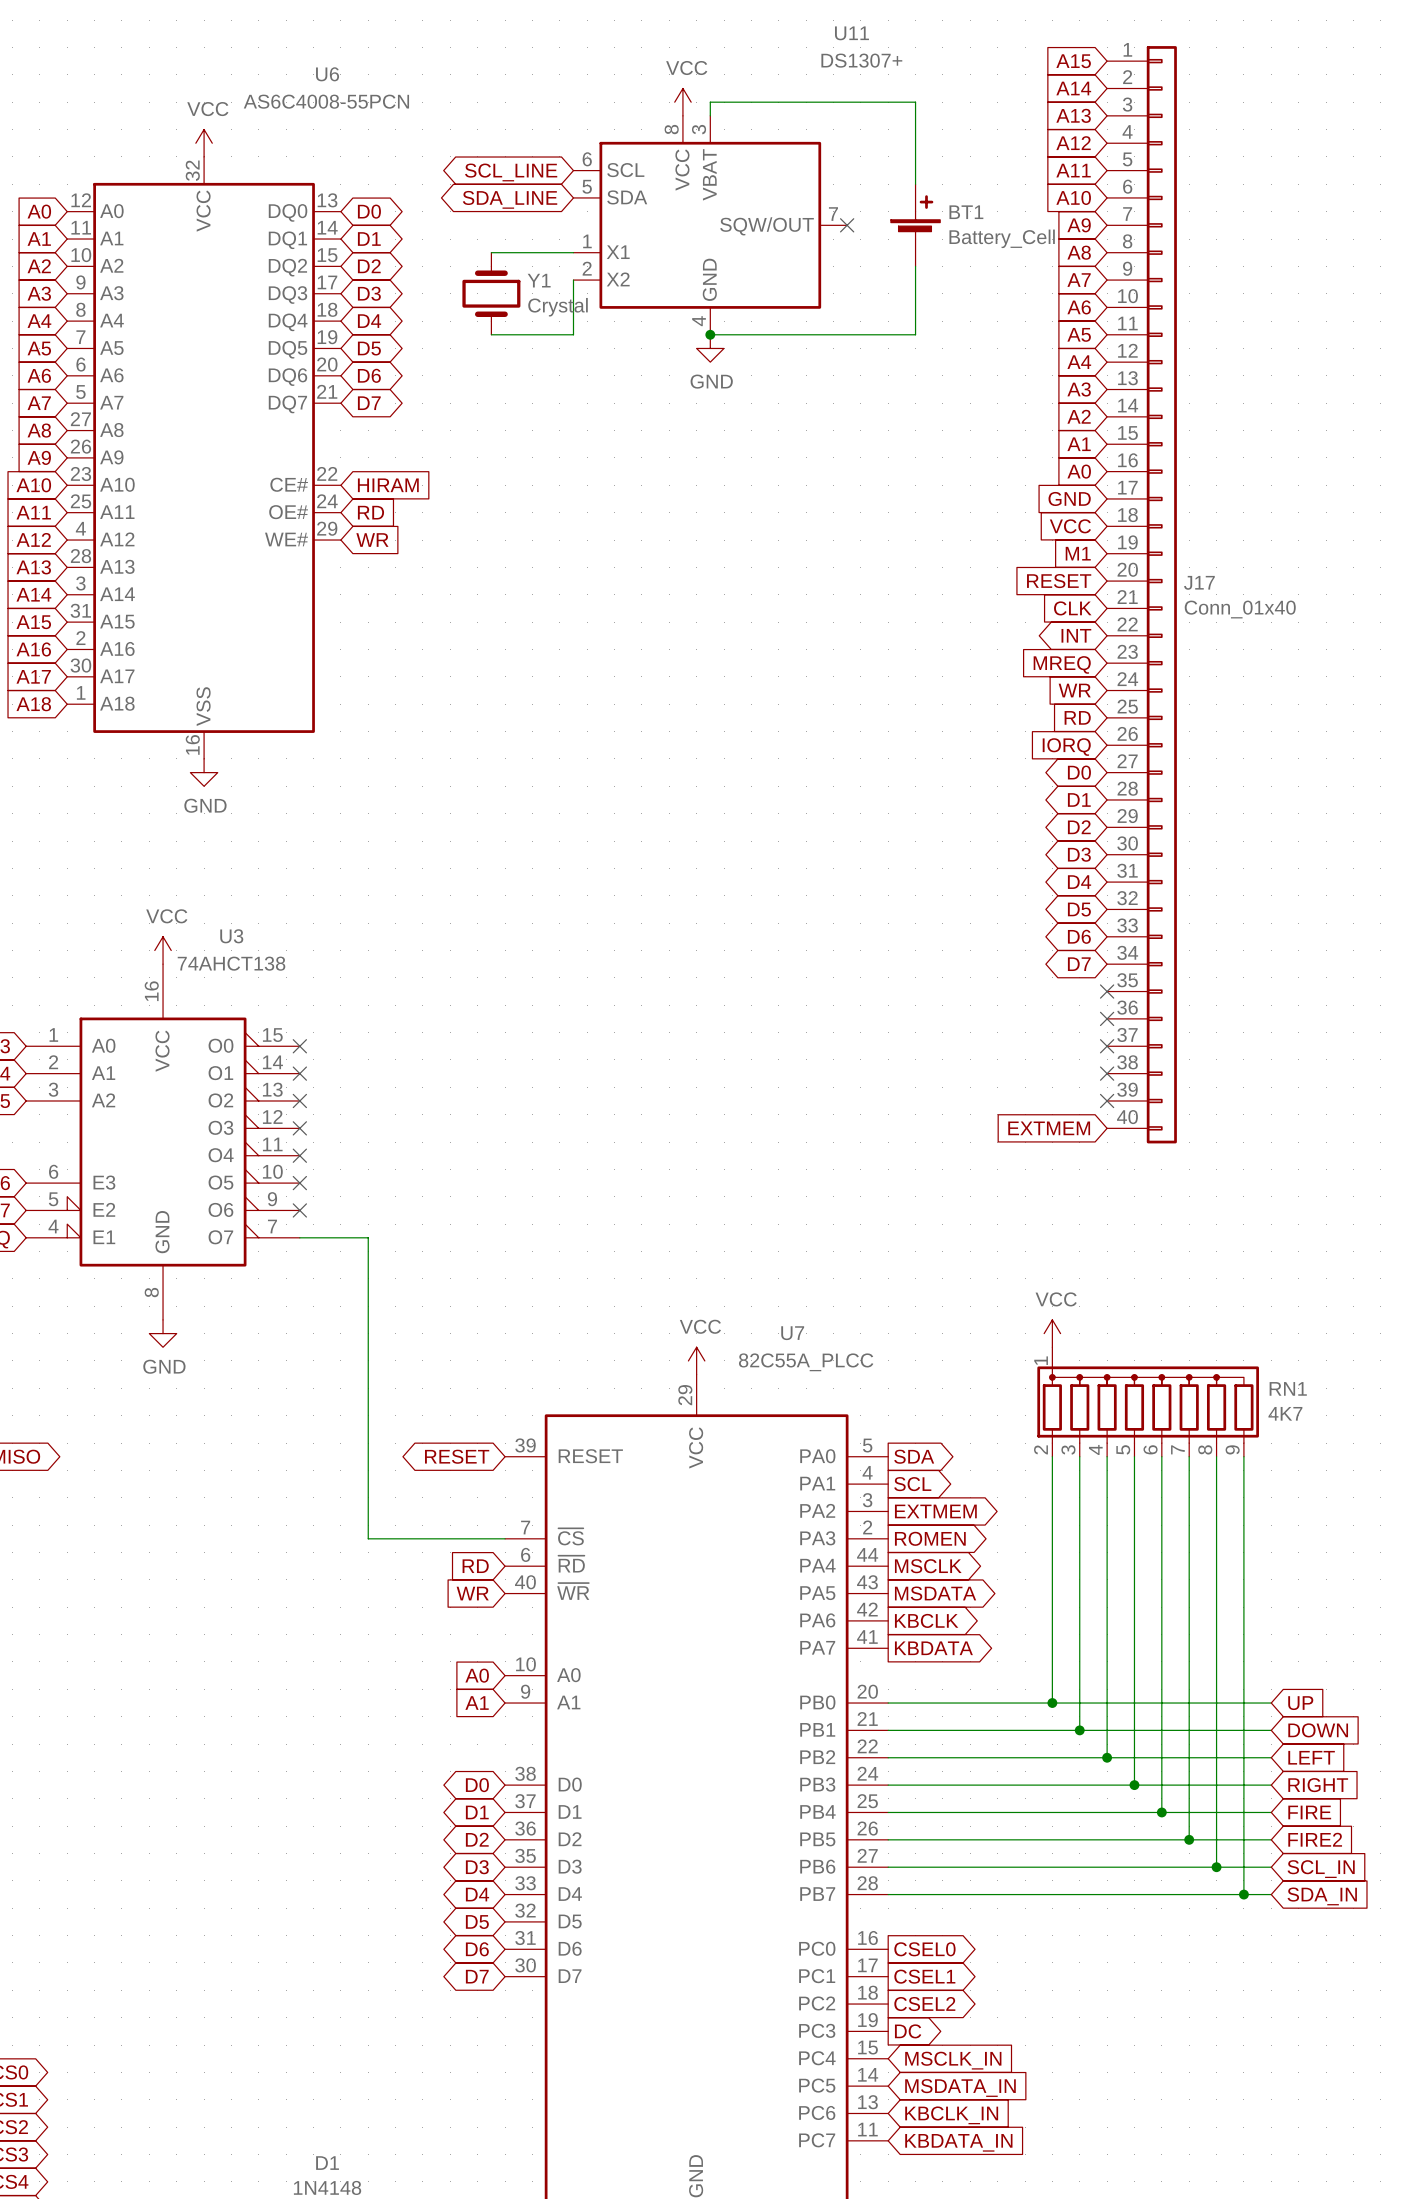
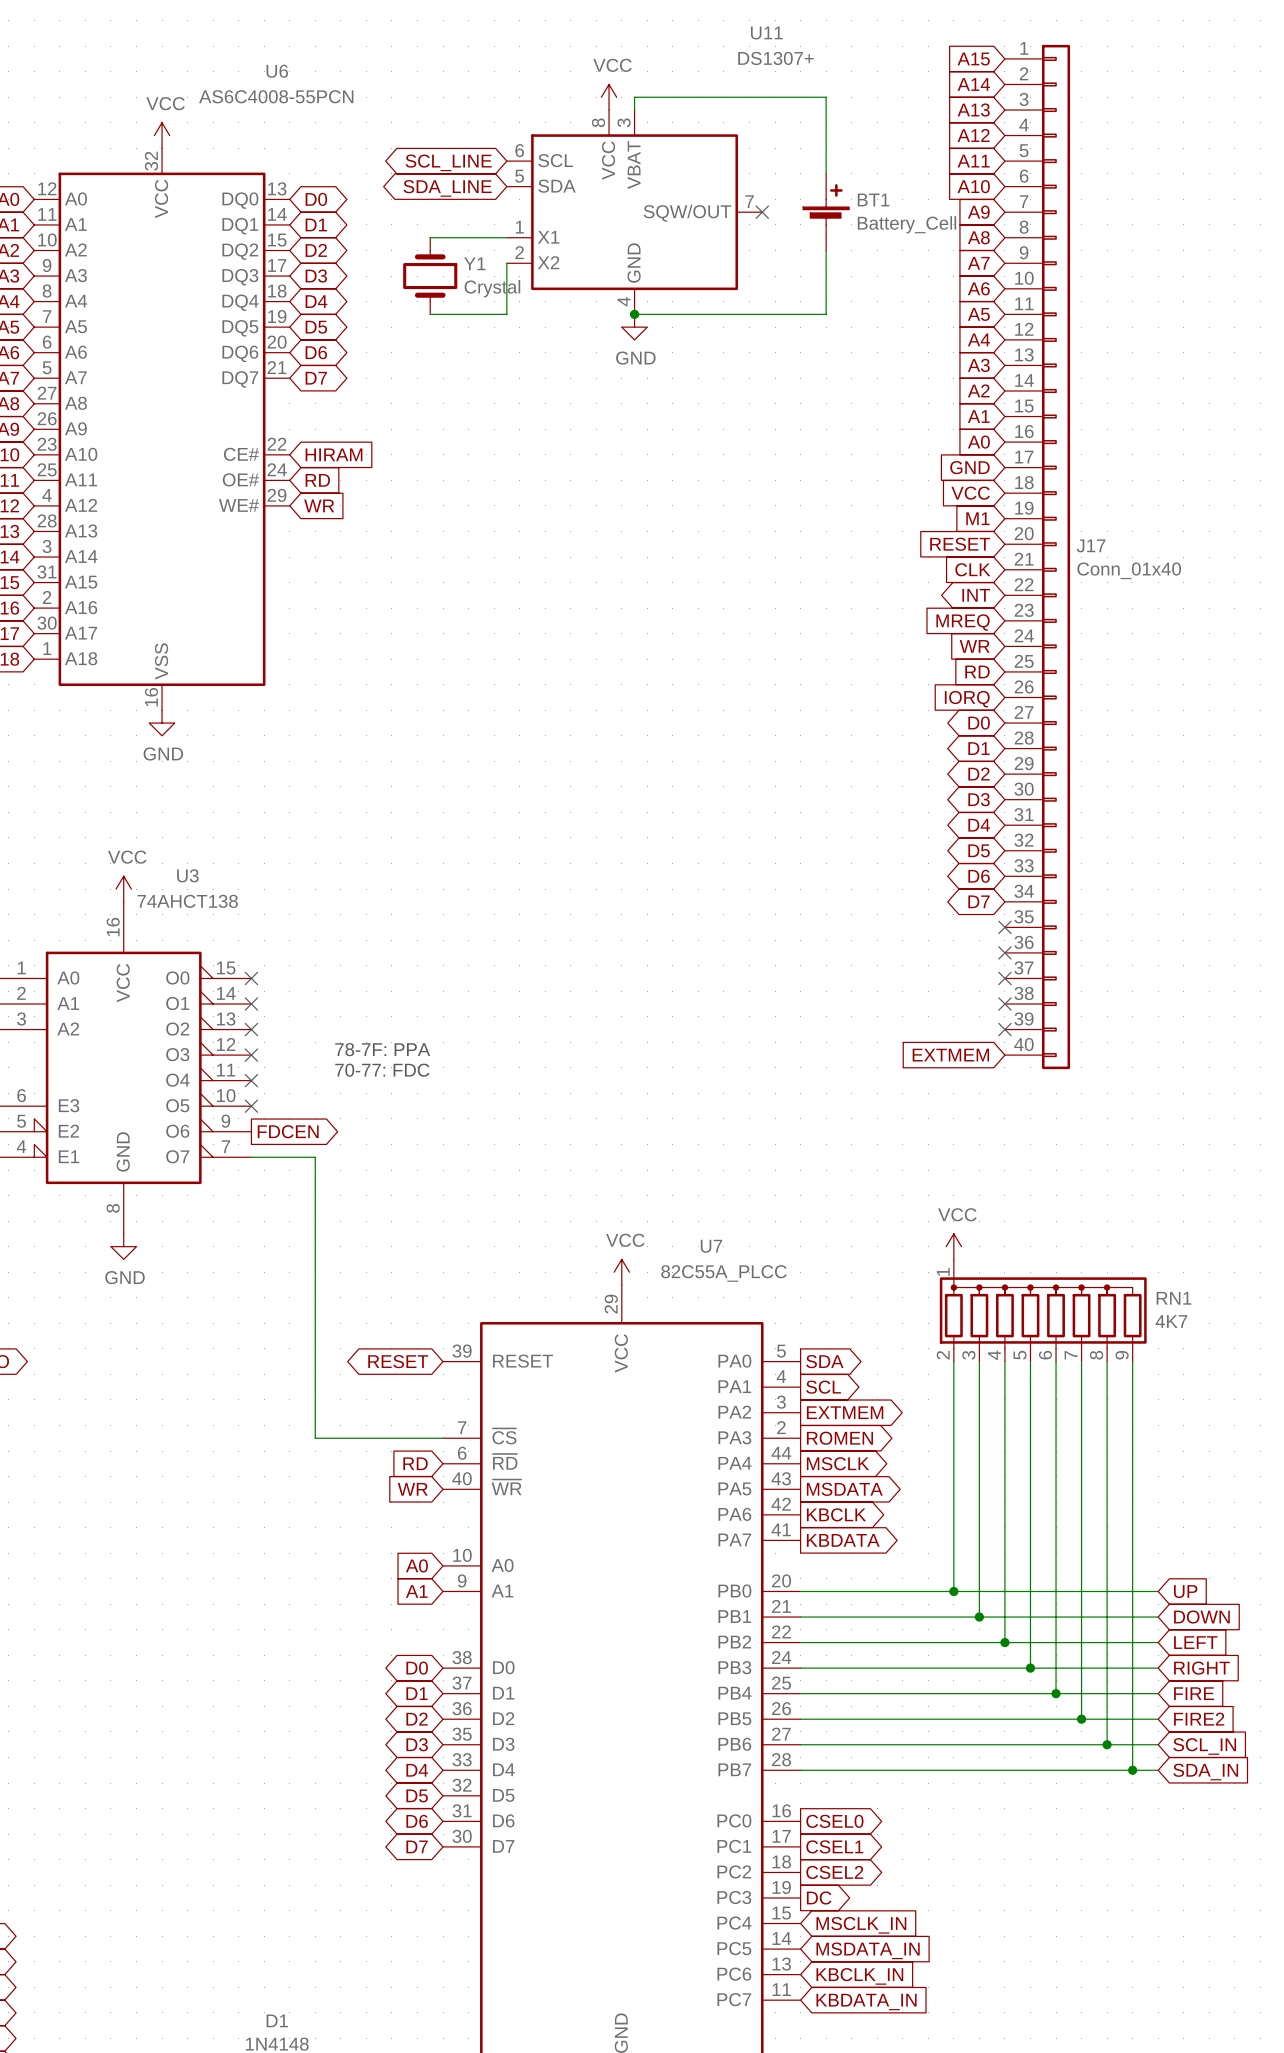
text: none -> 78-7F: PPA (382, 1049)
text: none -> 70-77: FDC (382, 1070)
no-connect mark: (299, 1210) -> none
global label: none -> FDCEN (288, 1131)

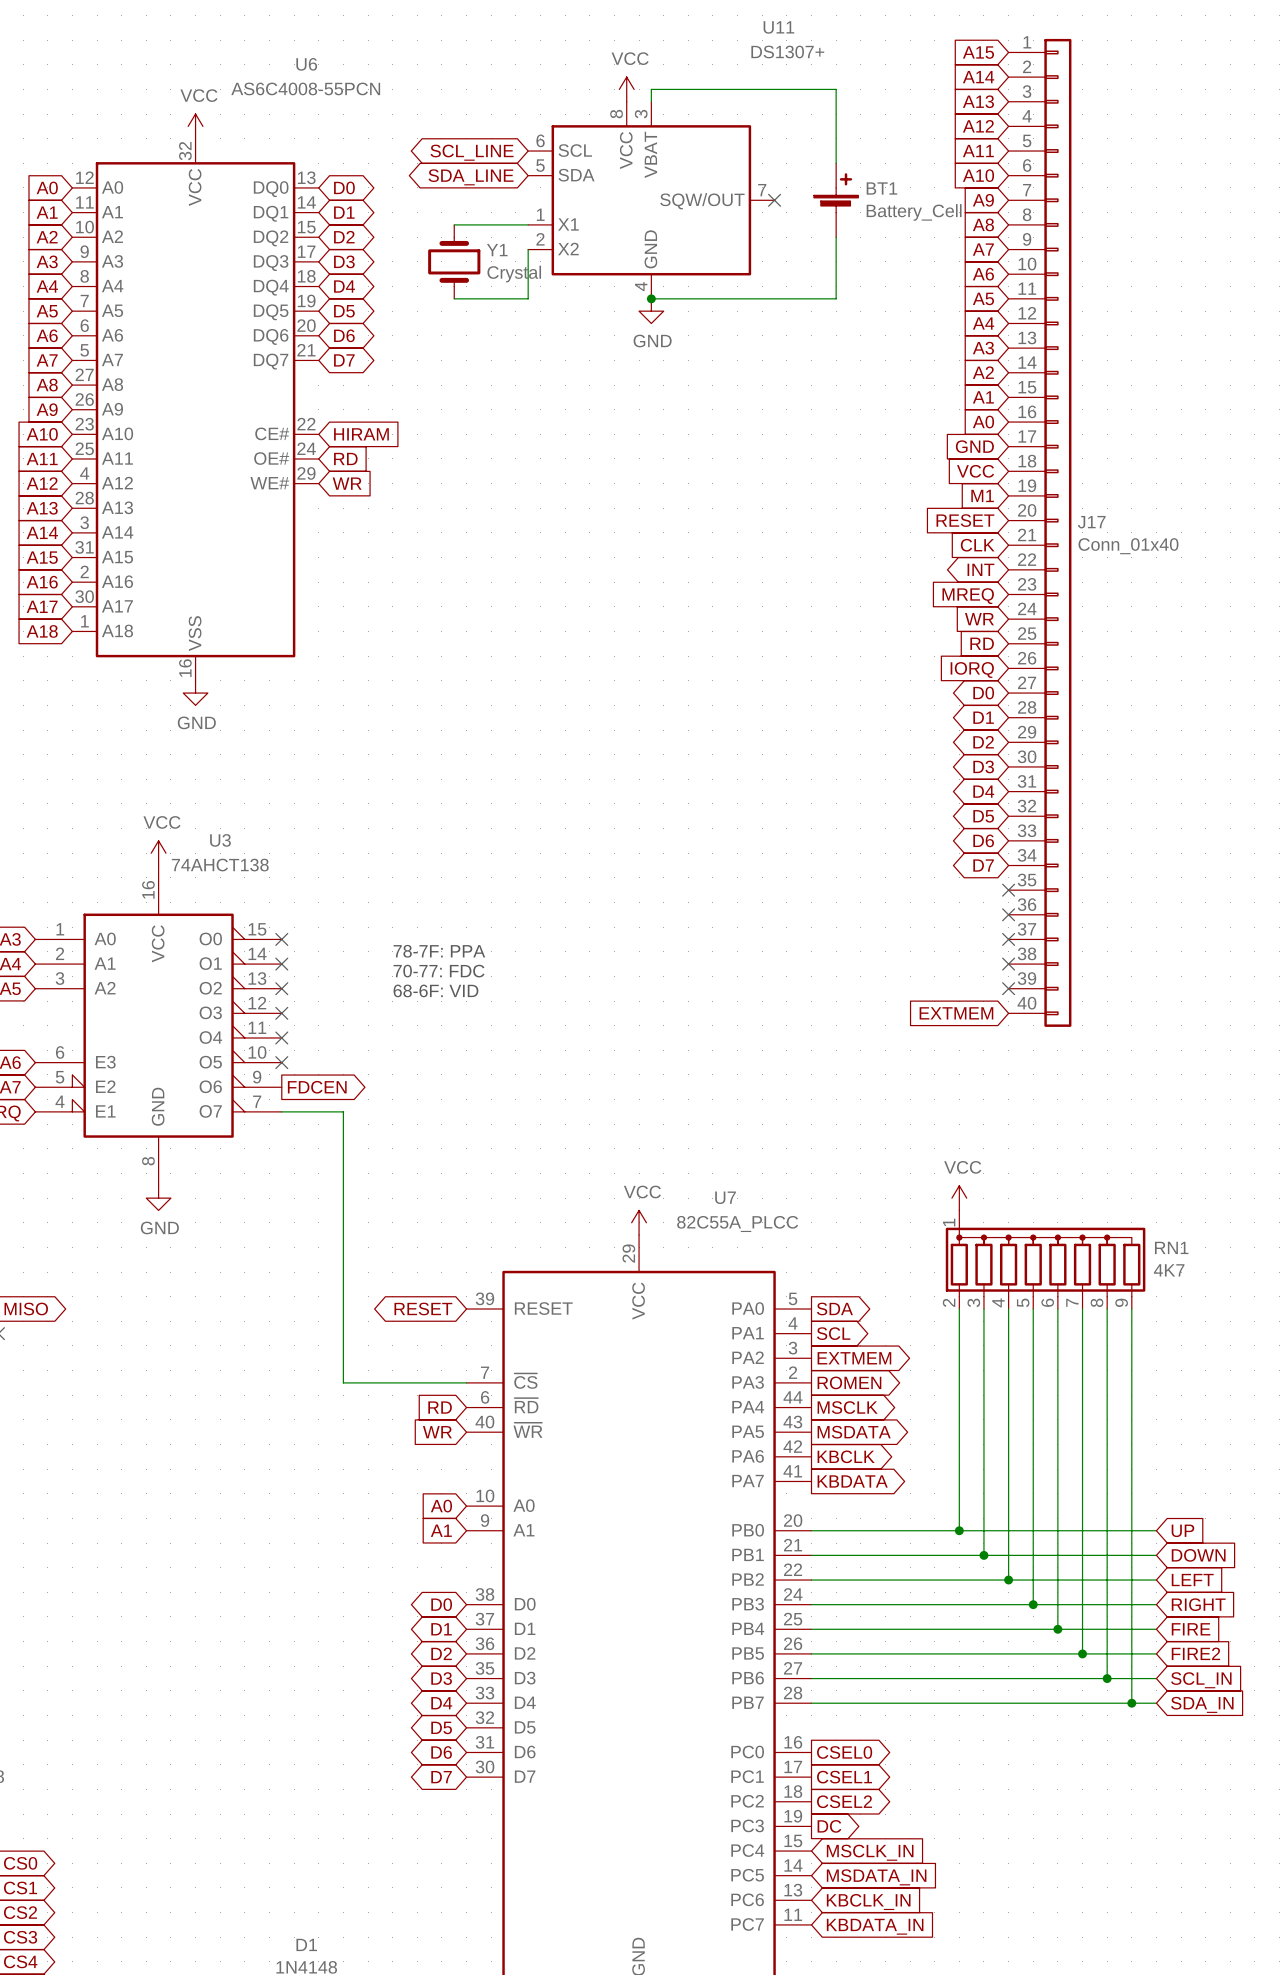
text: none -> 68-6F: VID (435, 990)
text position: 78-7F: PPA (382, 1049) -> 78-7F: PPA (439, 951)
text position: 70-77: FDC (382, 1070) -> 70-77: FDC (439, 971)

